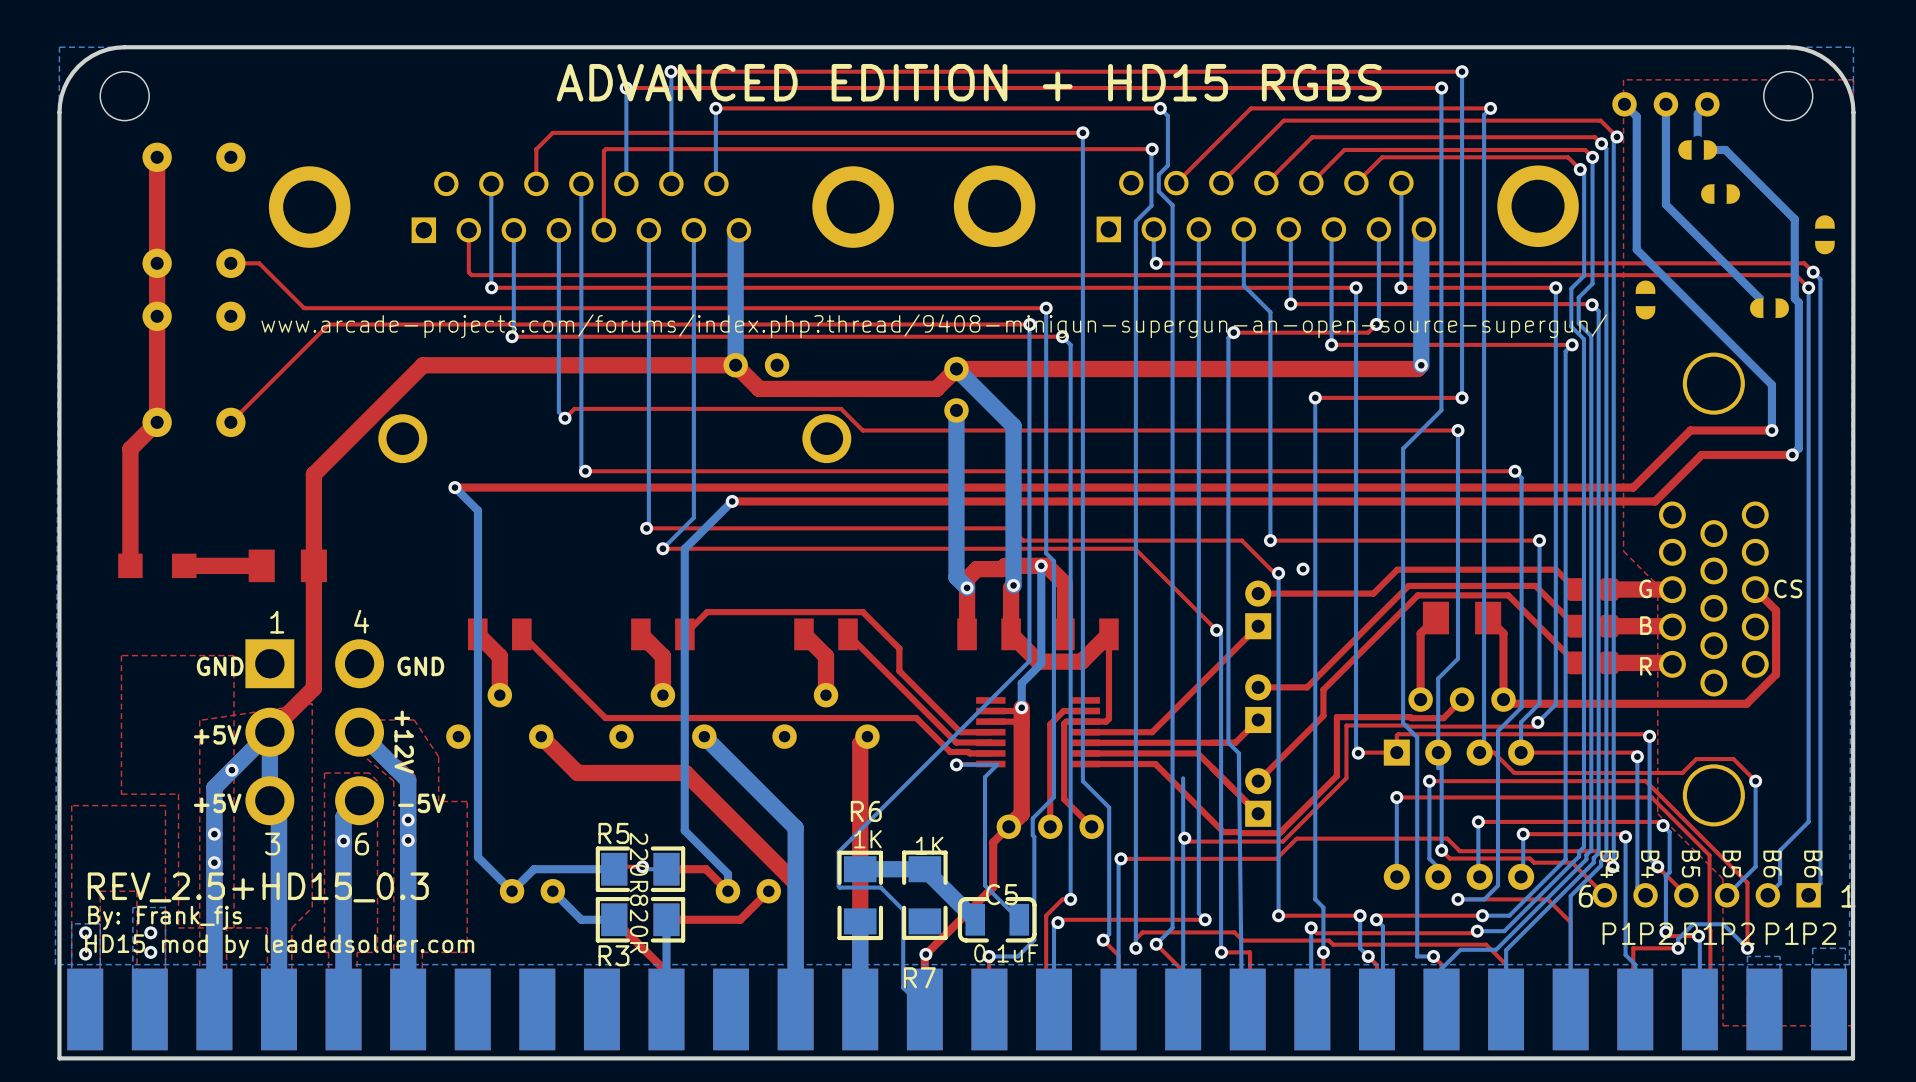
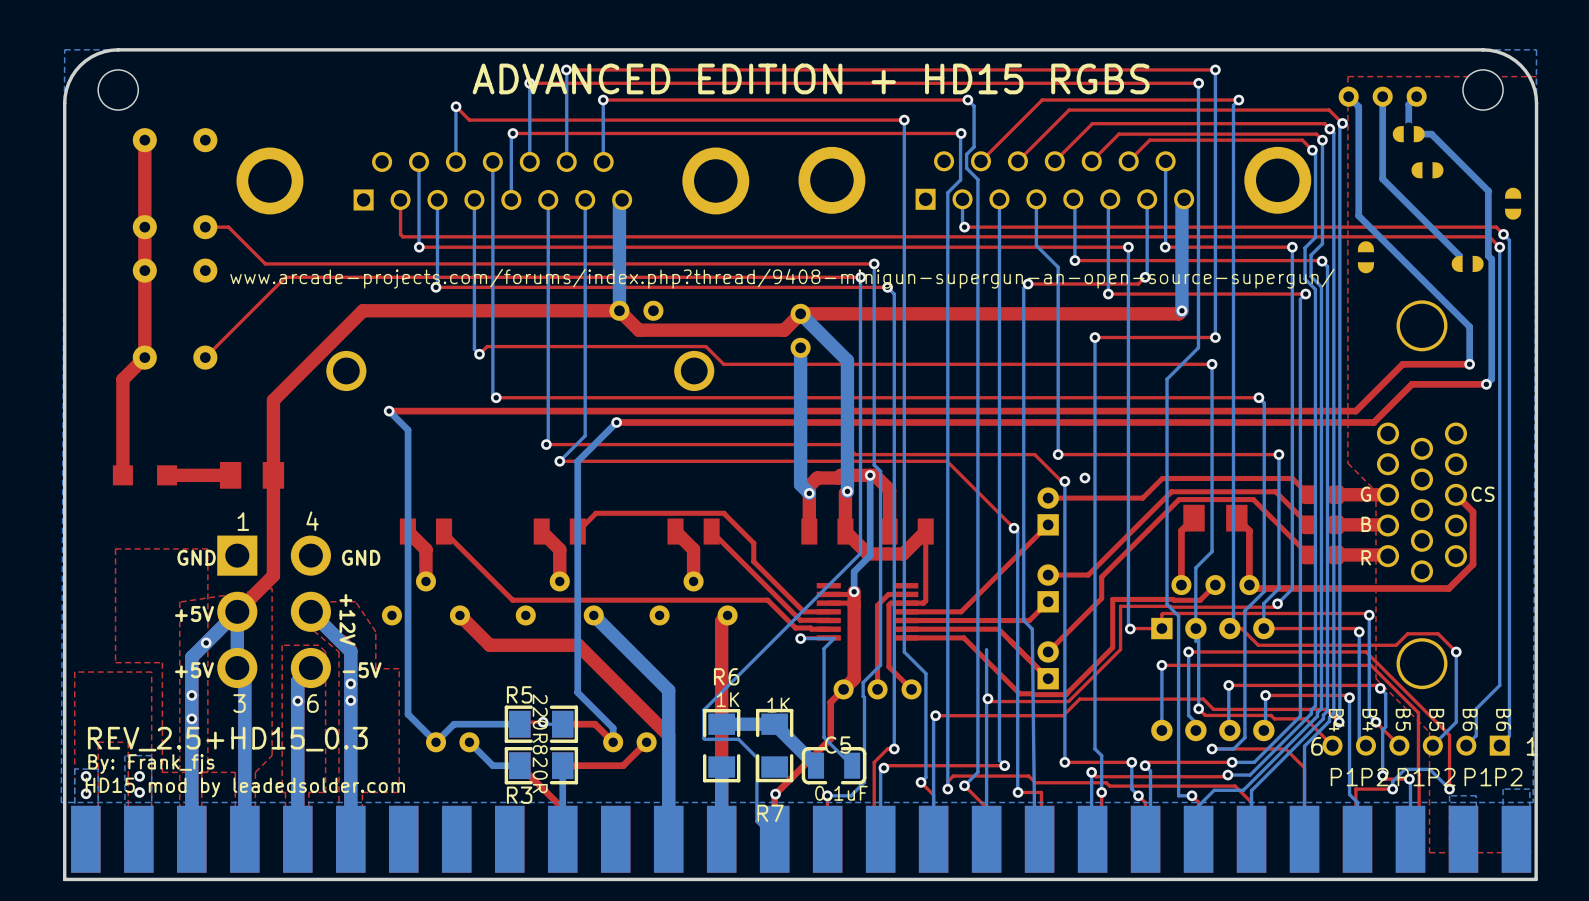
bottom track: none -> (455, 106) (455, 161)
via: none -> (456, 106)
top track: (552, 132) (536, 149) (536, 183) -> (469, 120) (456, 106)
top track: (605, 149) (603, 151) (603, 230) -> none
bottom track: none -> (512, 133) (511, 135) (511, 199)
via: none -> (512, 133)

